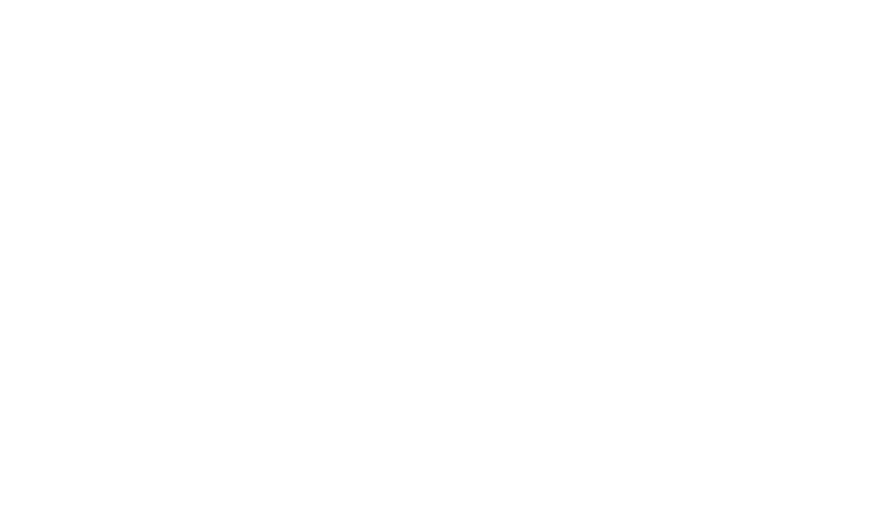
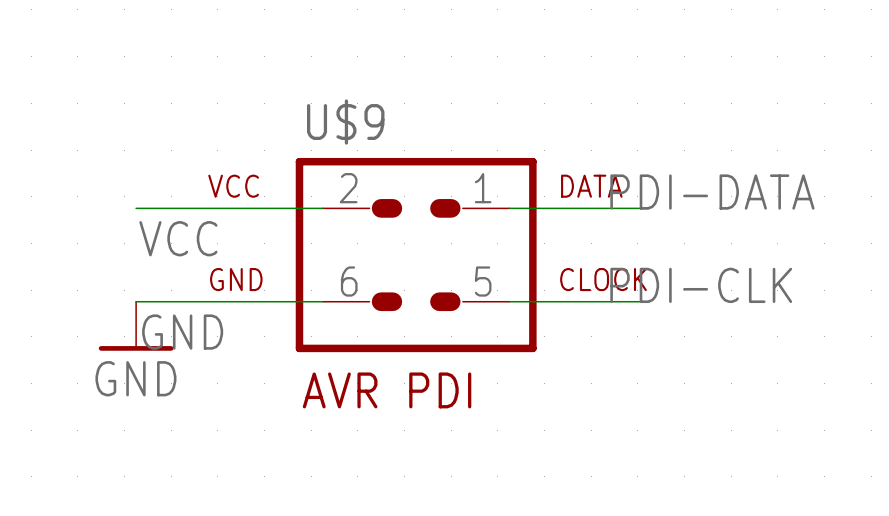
label: none -> PDI-DATA (712, 192)
wire: none -> (136, 208) (322, 208)
wire: none -> (509, 208) (649, 208)
label: none -> VCC (178, 238)
U$9: none -> (416, 255)
label: none -> PDI-CLK (701, 285)
wire: none -> (136, 301) (322, 301)
wire: none -> (509, 301) (649, 301)
power symbol: none -> GND (136, 326)
label: none -> GND (182, 332)

